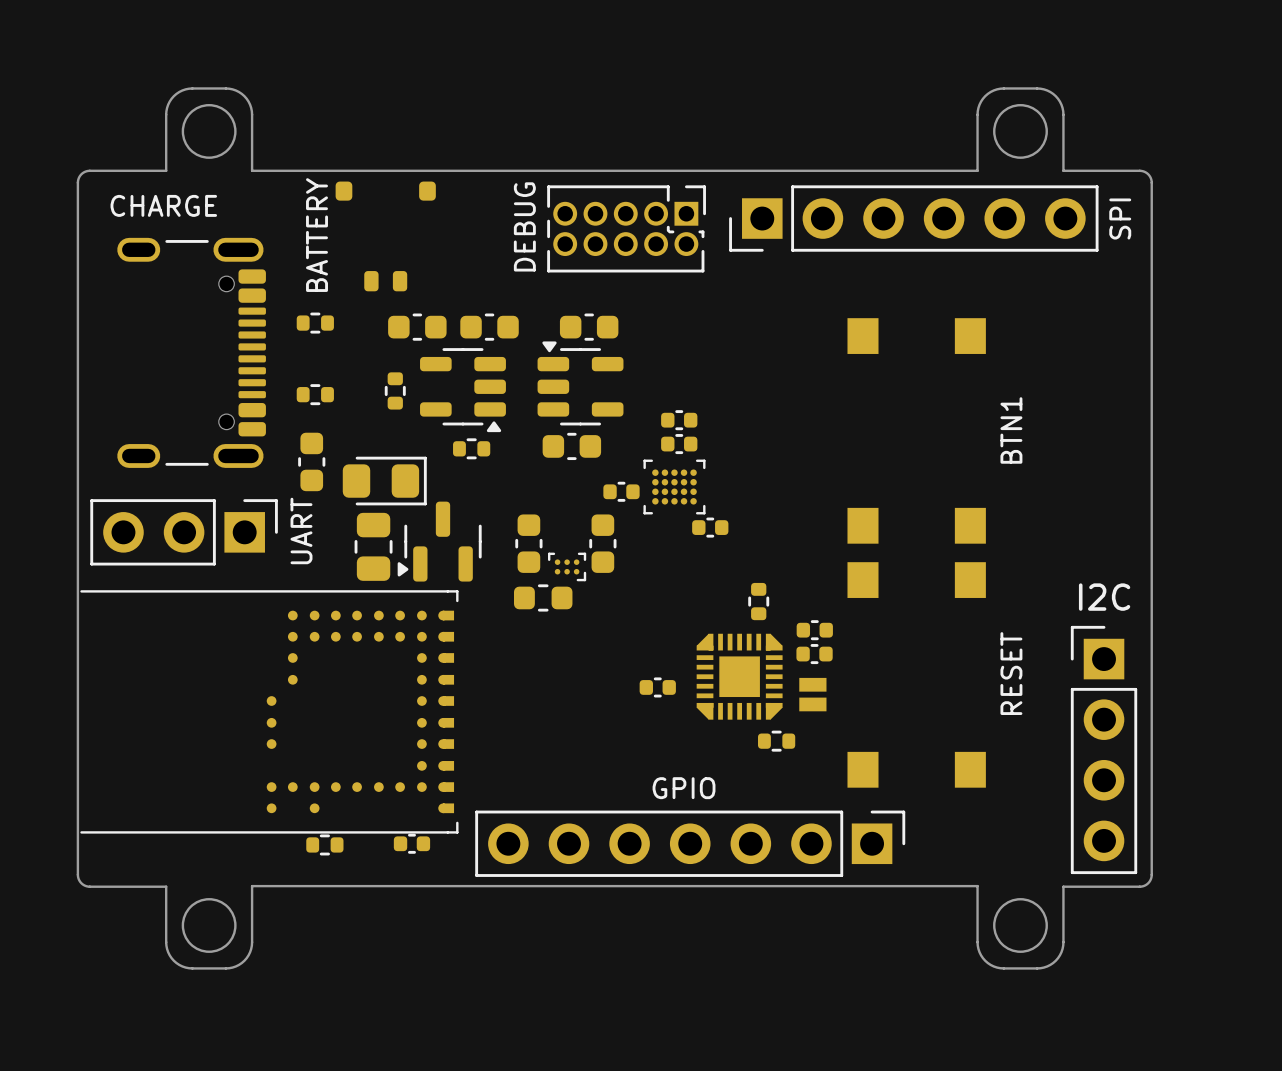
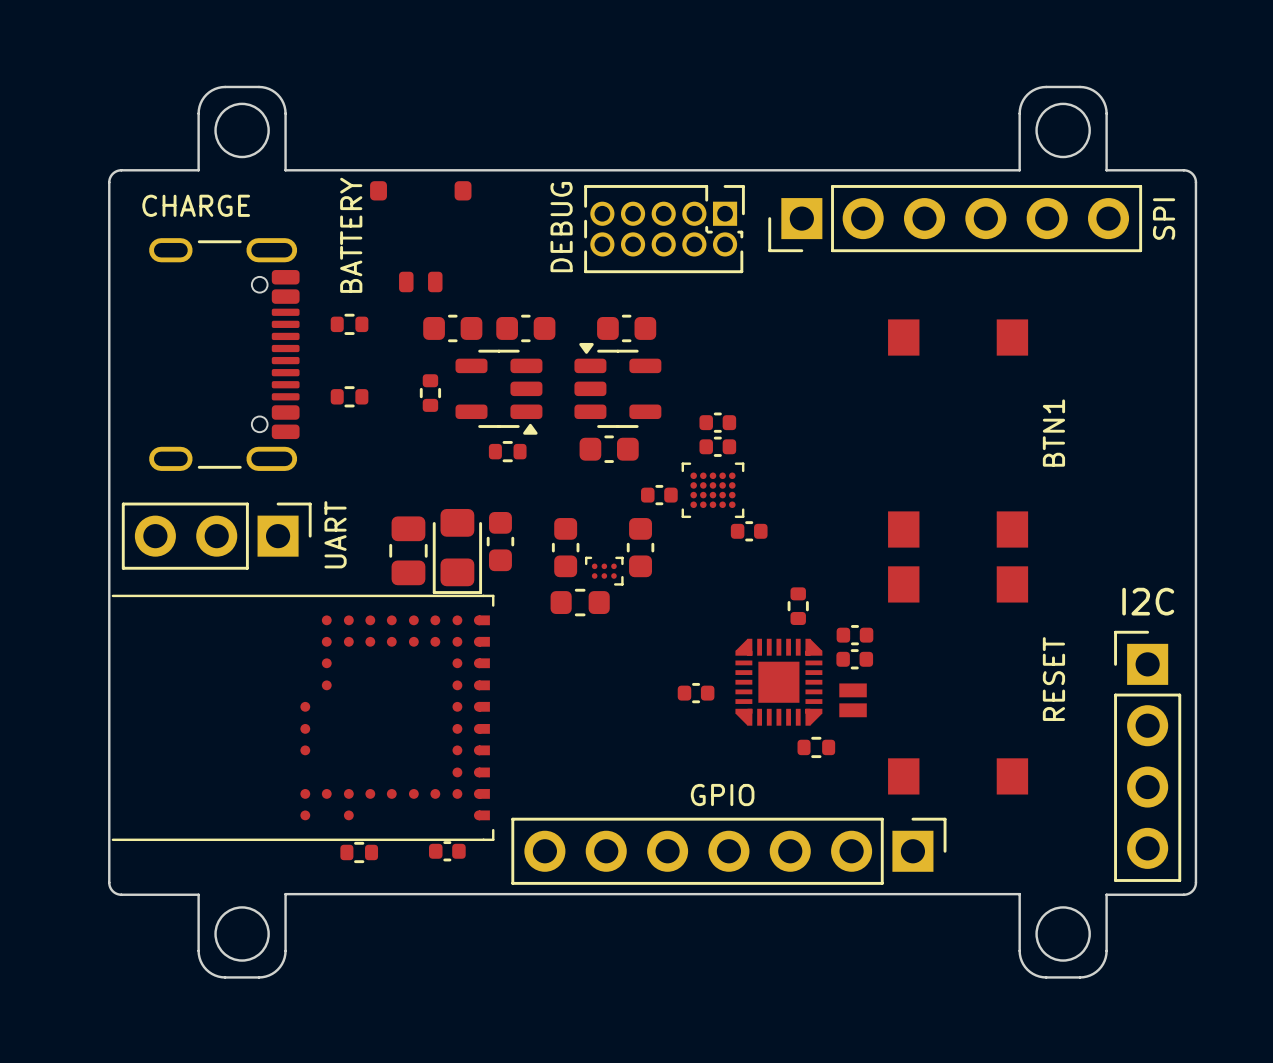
part position: (311, 461) -> (500, 541)
part rotation: 0° (384, 481) -> 90° clockwise (457, 551)
part position: (384, 481) -> (457, 551)
part: (439, 541) -> none

